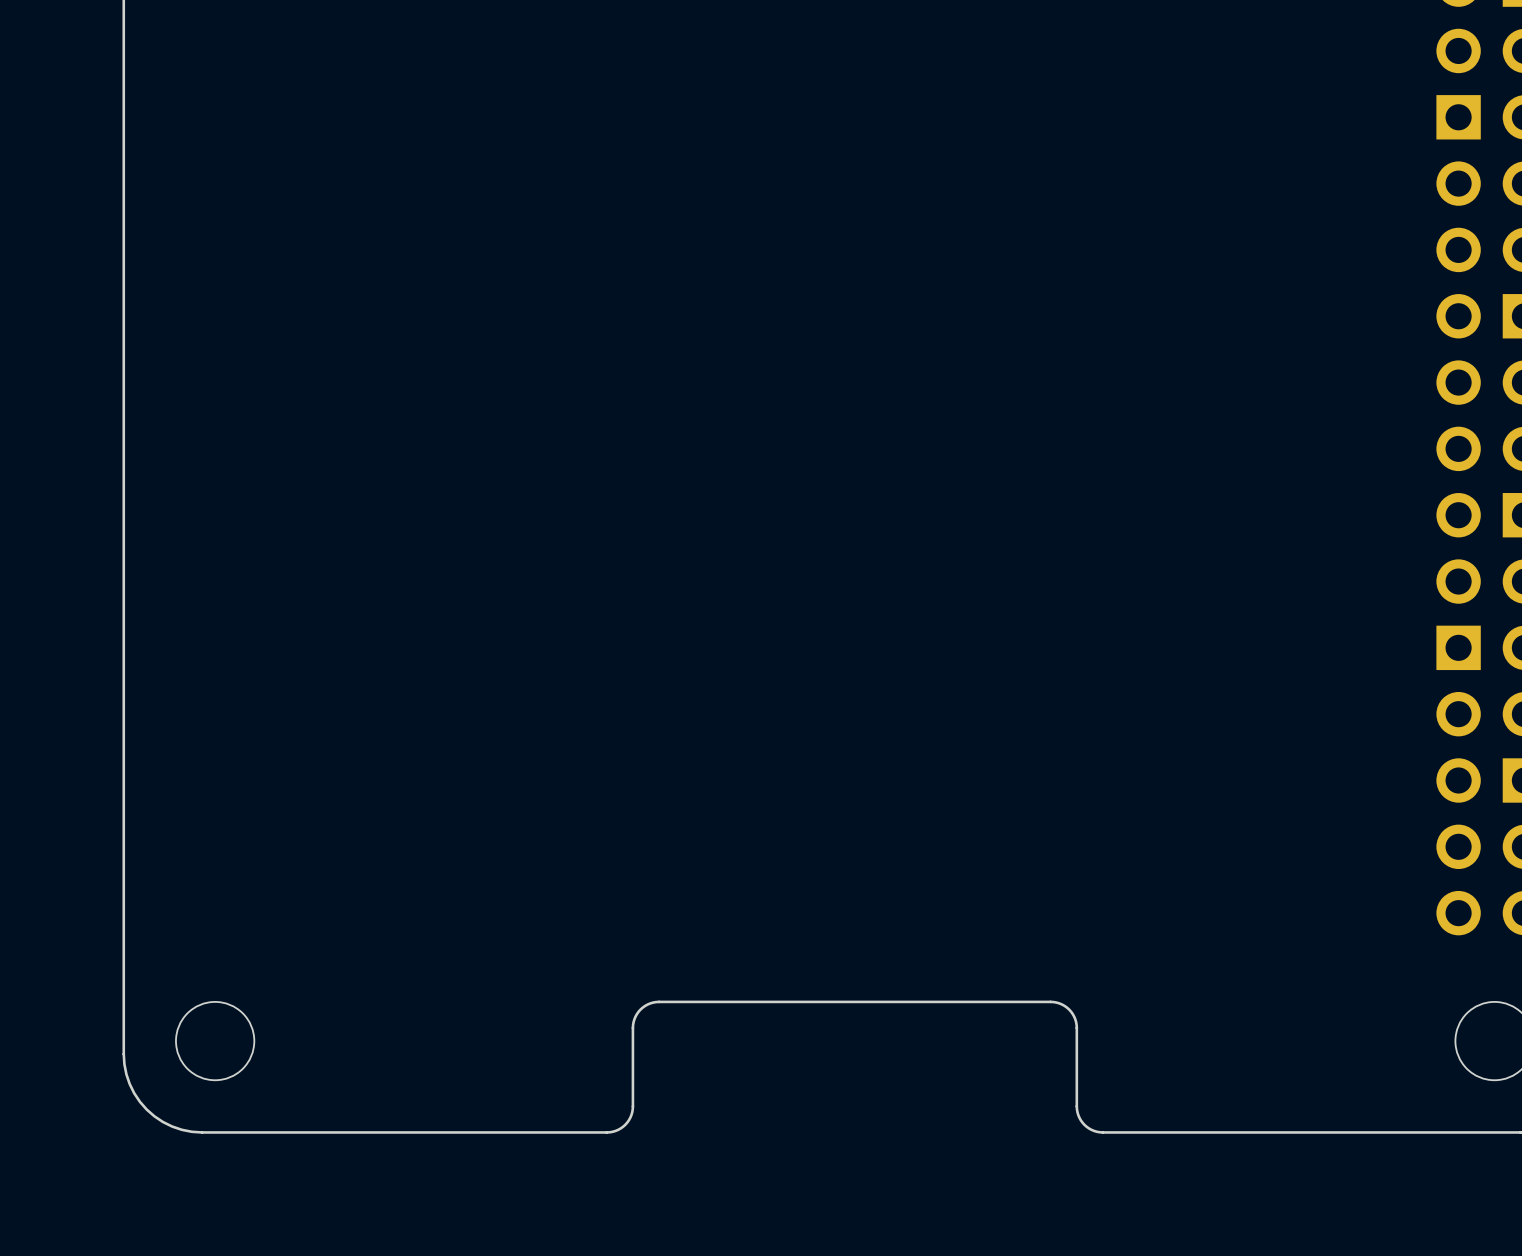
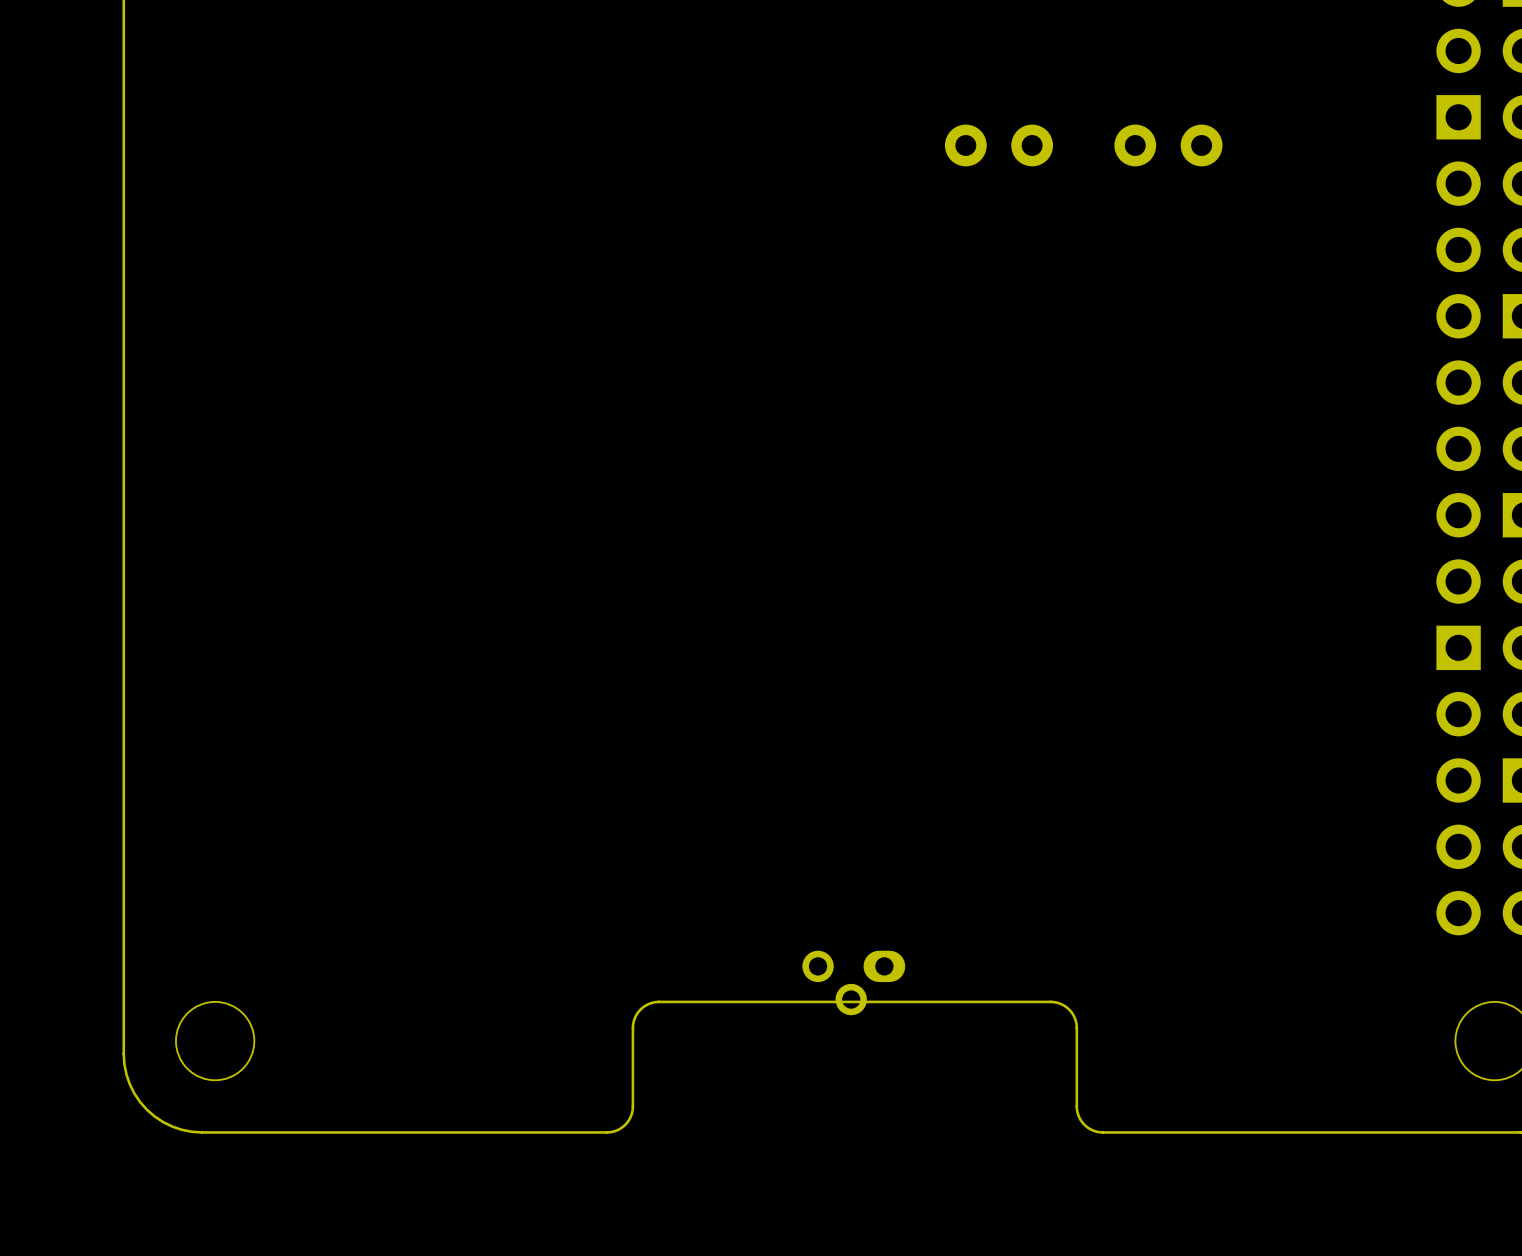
part: none -> (998, 145)
part: none -> (1168, 145)
part: none -> (853, 982)

